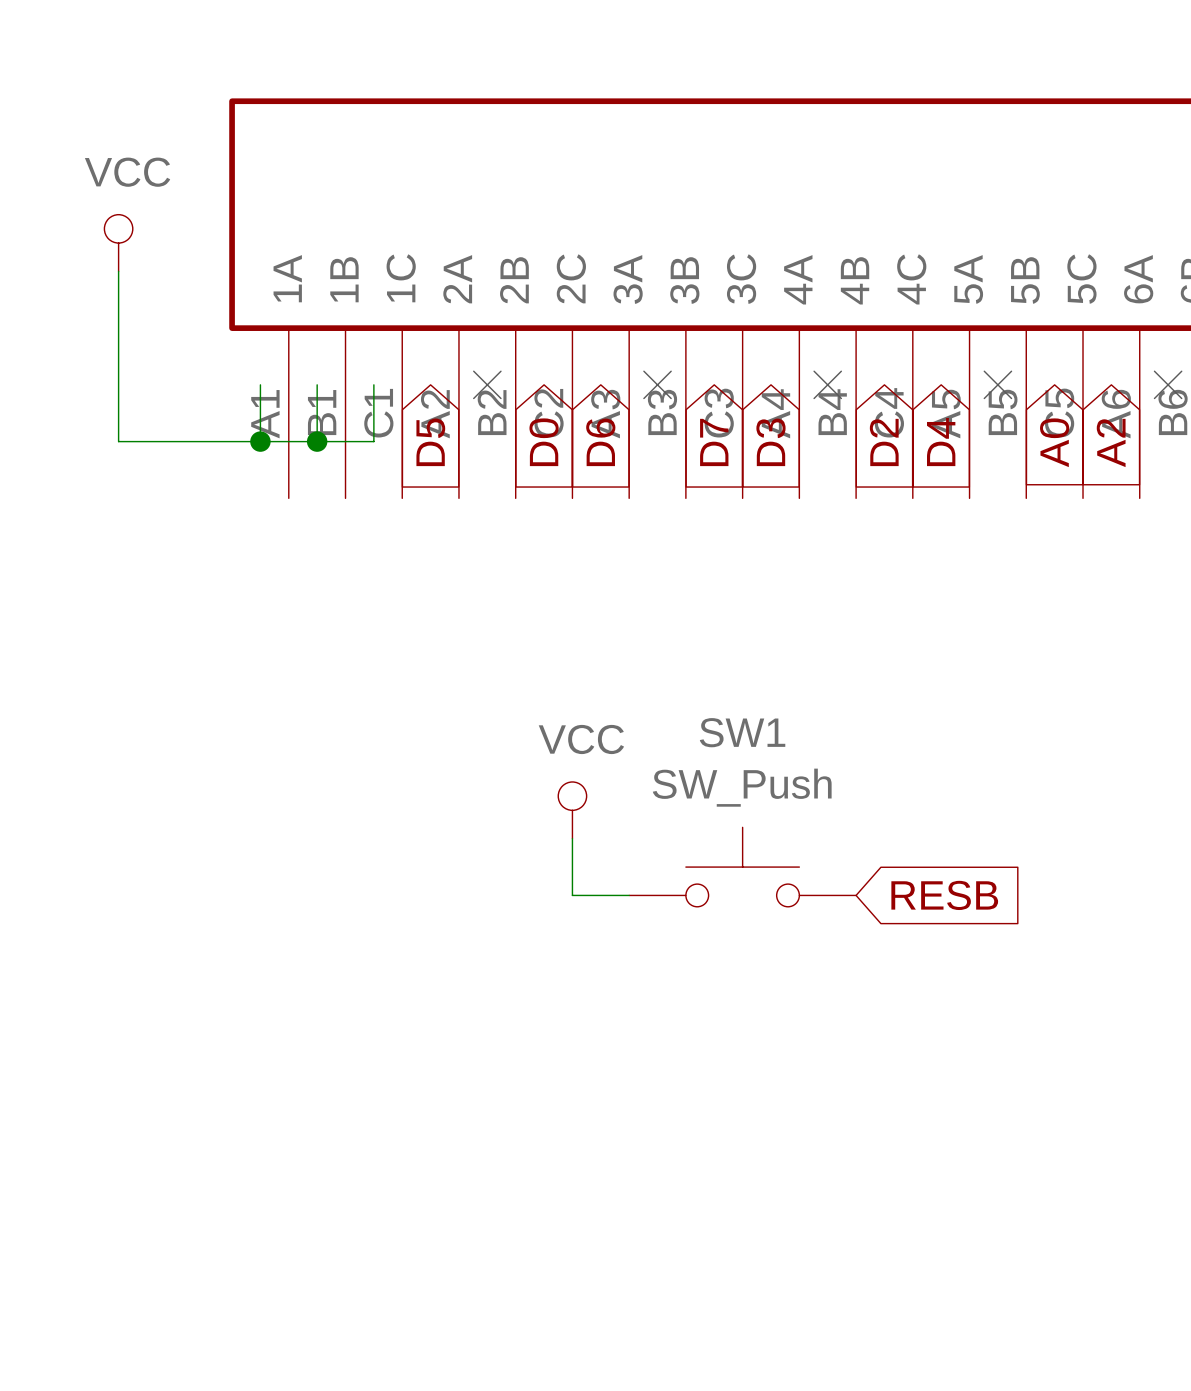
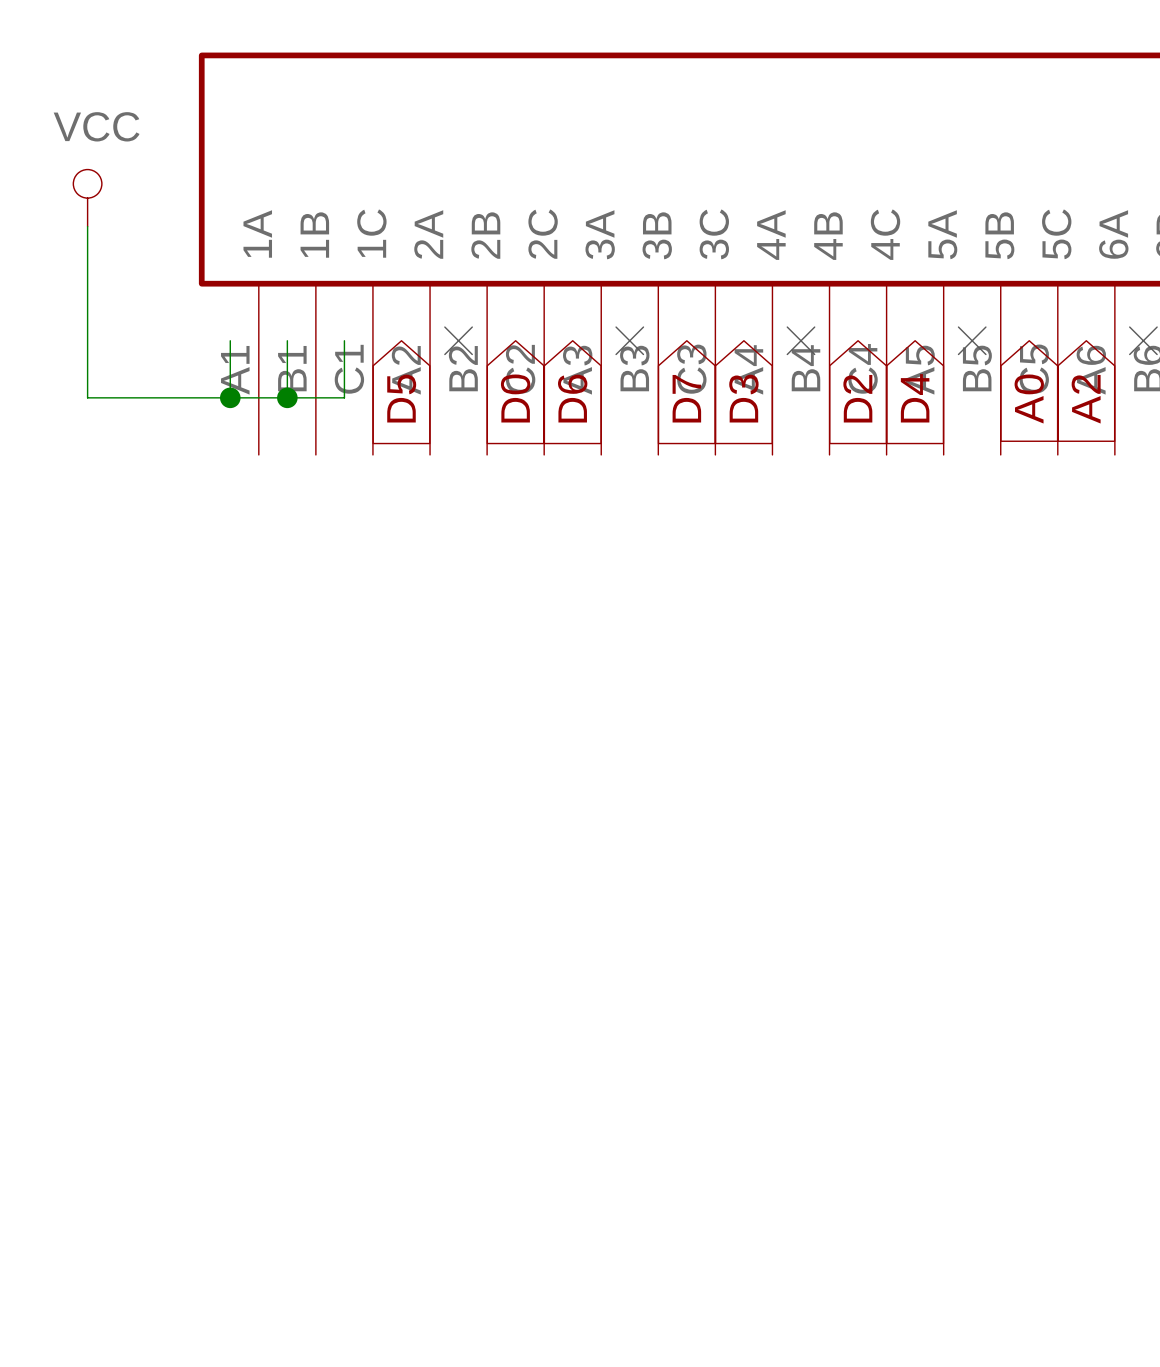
power symbol: VCC (572, 810) -> none
wire: (572, 838) (572, 895) (629, 895) -> none
SW1: SW_Push (742, 867) -> none
global label: RESB (944, 895) -> none

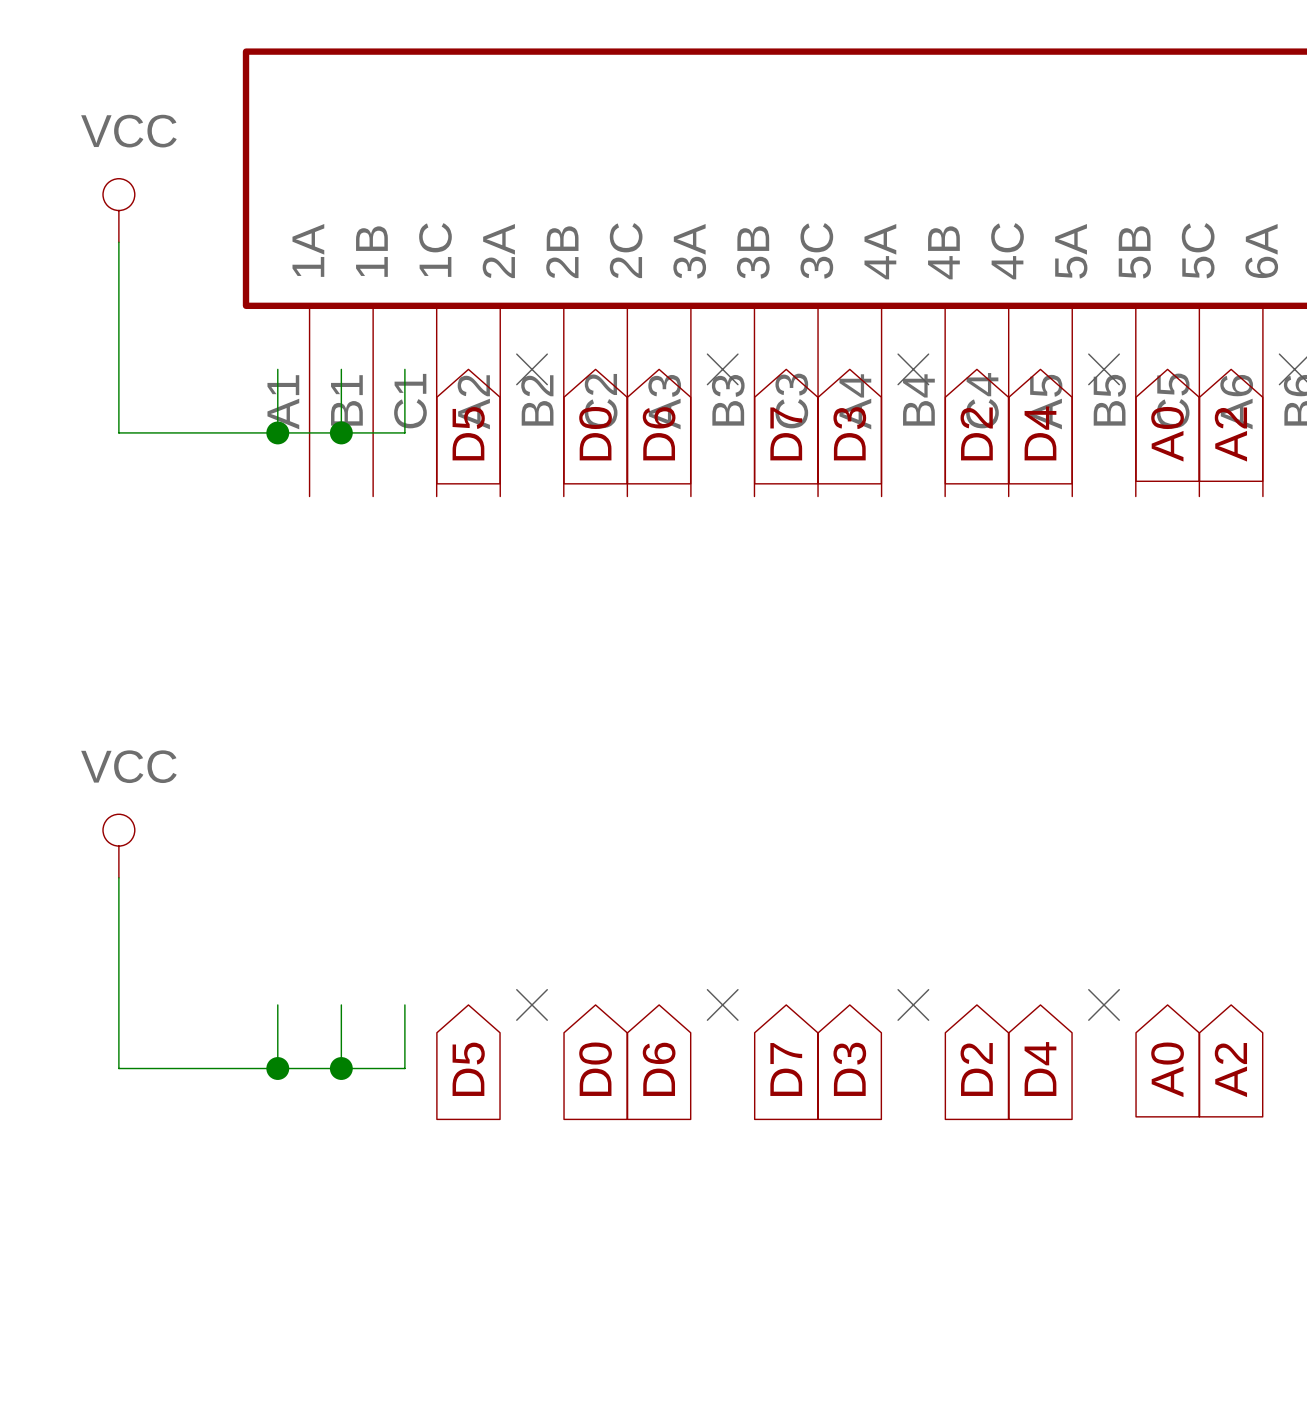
power symbol: none -> VCC (118, 846)
wire: none -> (118, 877) (118, 1068) (404, 1068) (404, 1004)
wire: none -> (277, 1004) (277, 1068)
wire: none -> (341, 1004) (341, 1068)
no-connect mark: none -> (532, 1004)
no-connect mark: none -> (722, 1004)
no-connect mark: none -> (913, 1004)
no-connect mark: none -> (1104, 1004)
junction: none -> (277, 1068)
junction: none -> (341, 1068)
global label: none -> D5 (468, 1069)
global label: none -> D0 (595, 1069)
global label: none -> D6 (659, 1069)
global label: none -> D7 (786, 1069)
global label: none -> D3 (849, 1069)
global label: none -> D2 (976, 1069)
global label: none -> D4 (1040, 1069)
global label: none -> A0 (1167, 1069)
global label: none -> A2 (1230, 1070)

